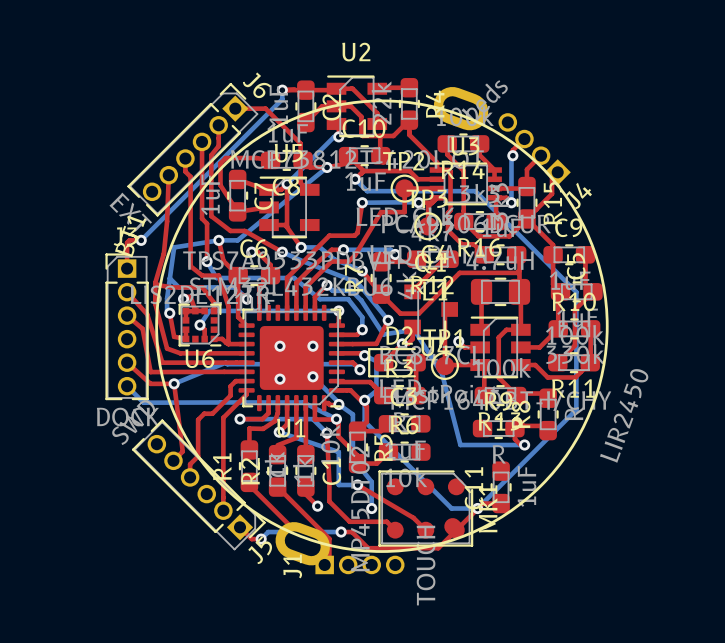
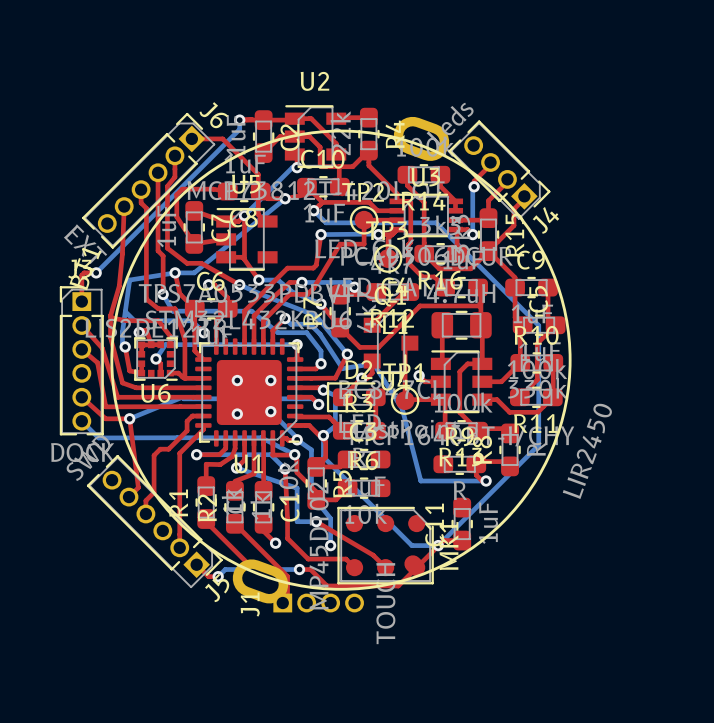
J4 footprint: [498, 113, 571, 186] -> [448, 120, 551, 220]

